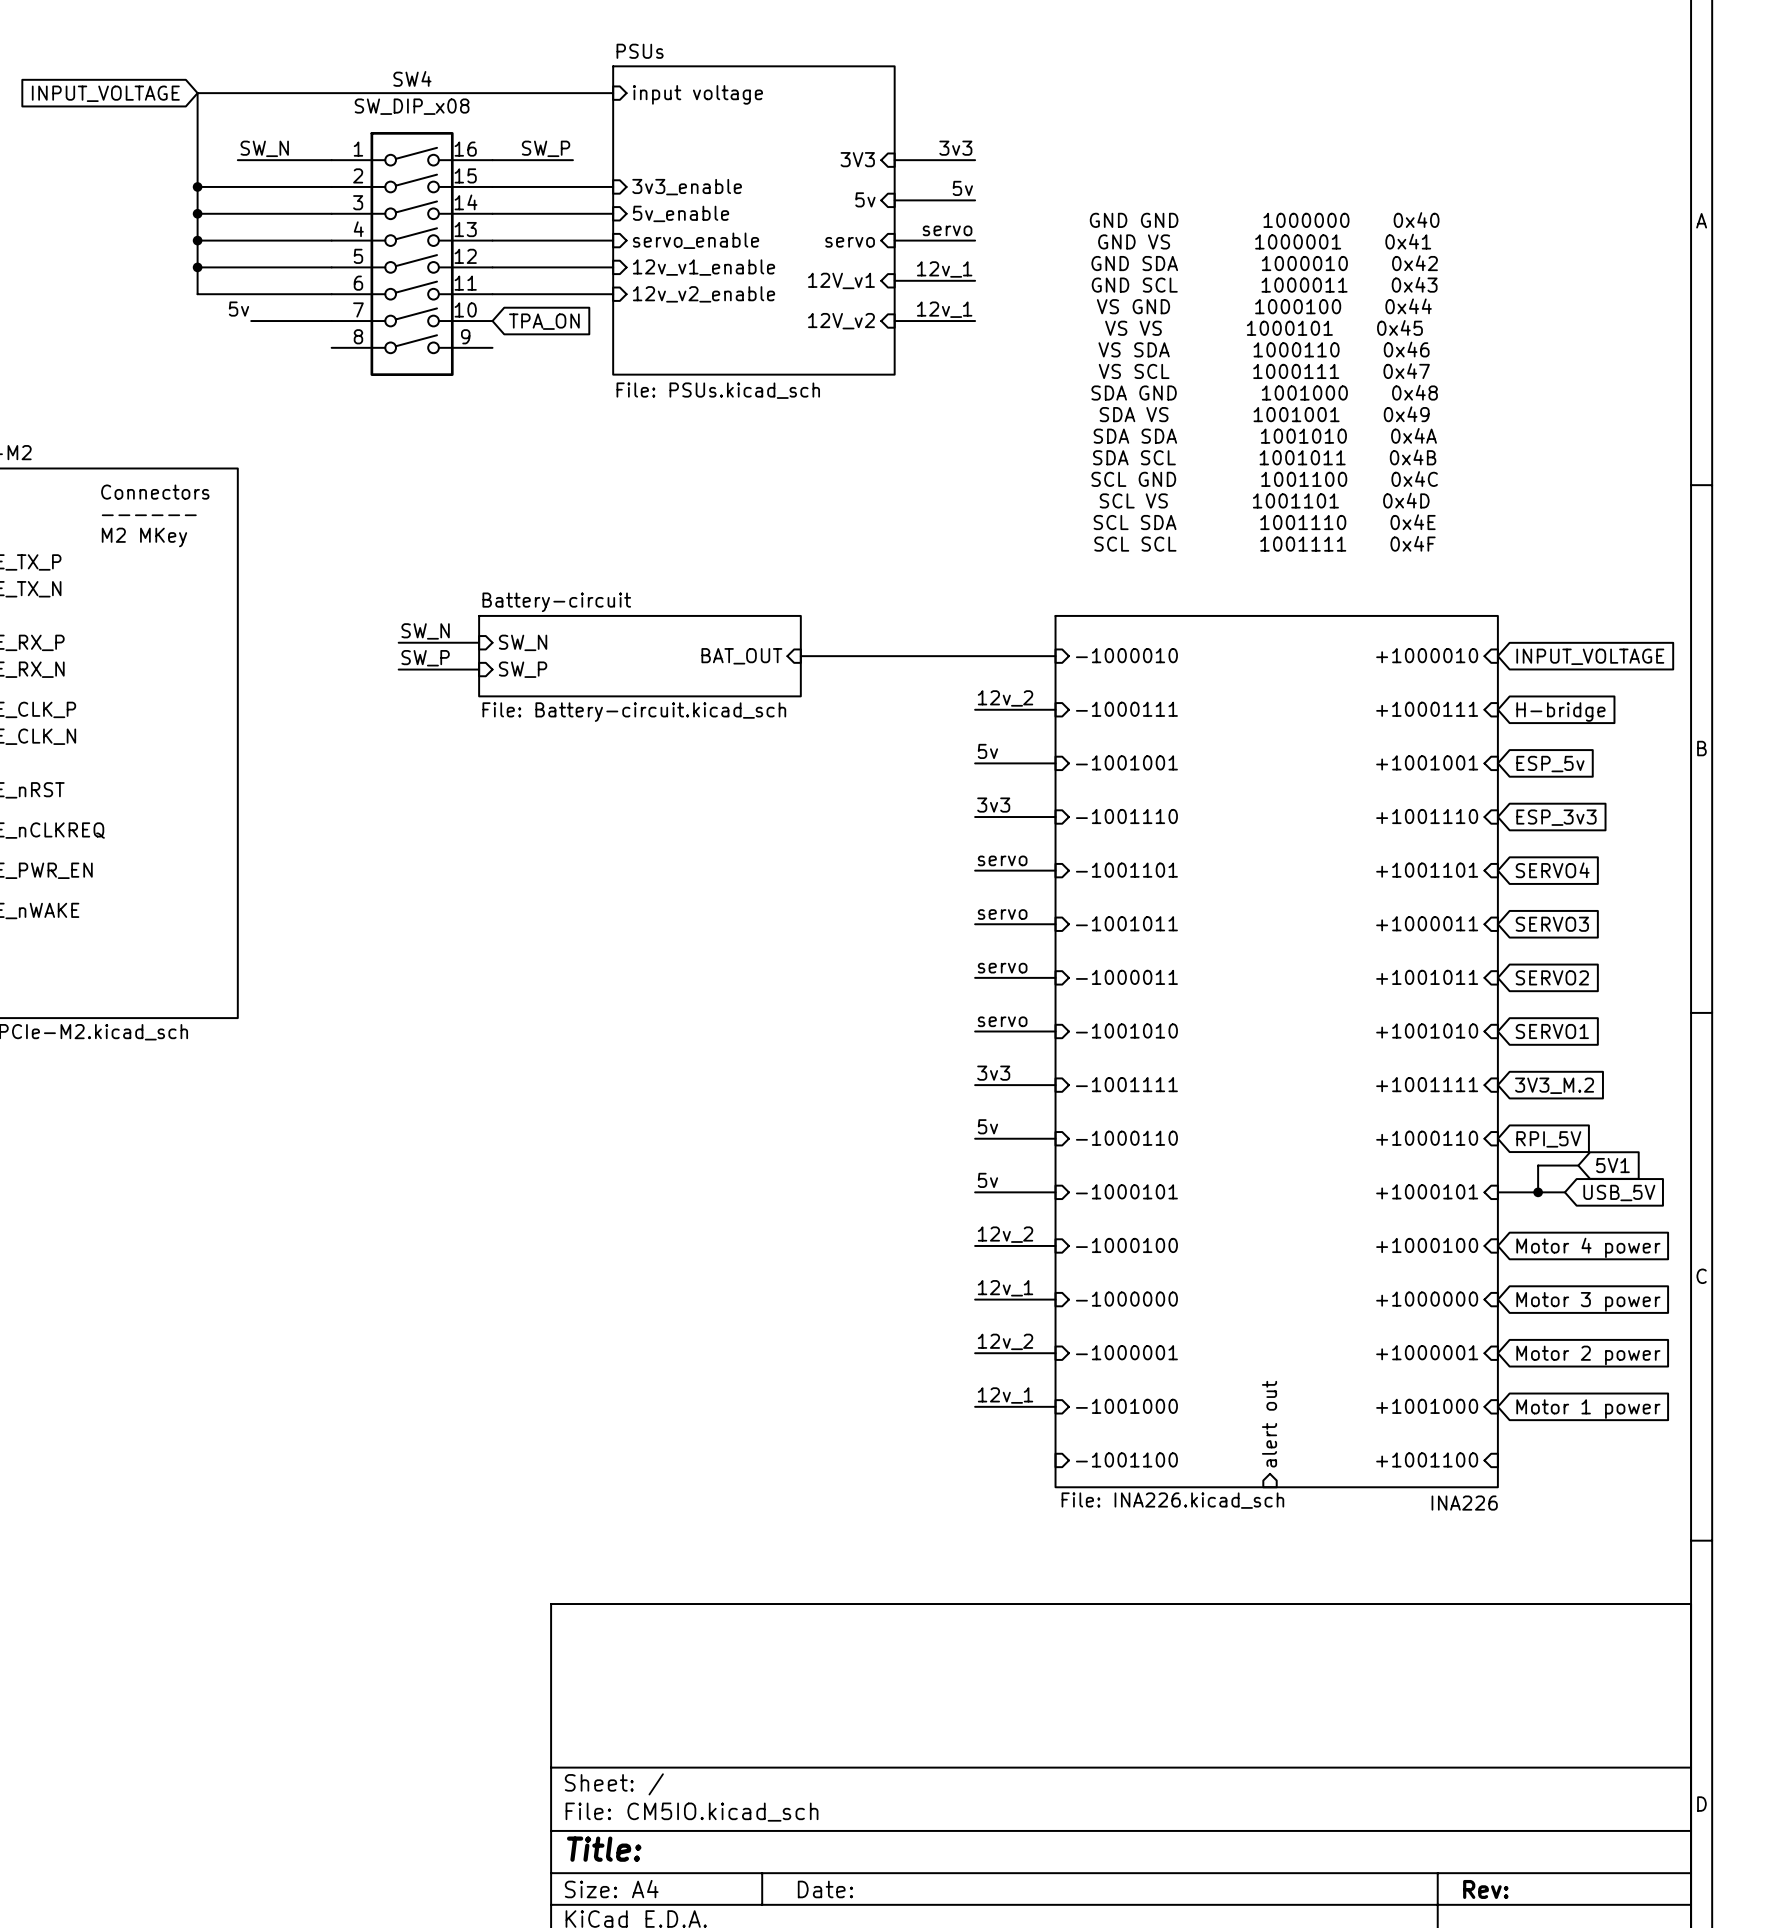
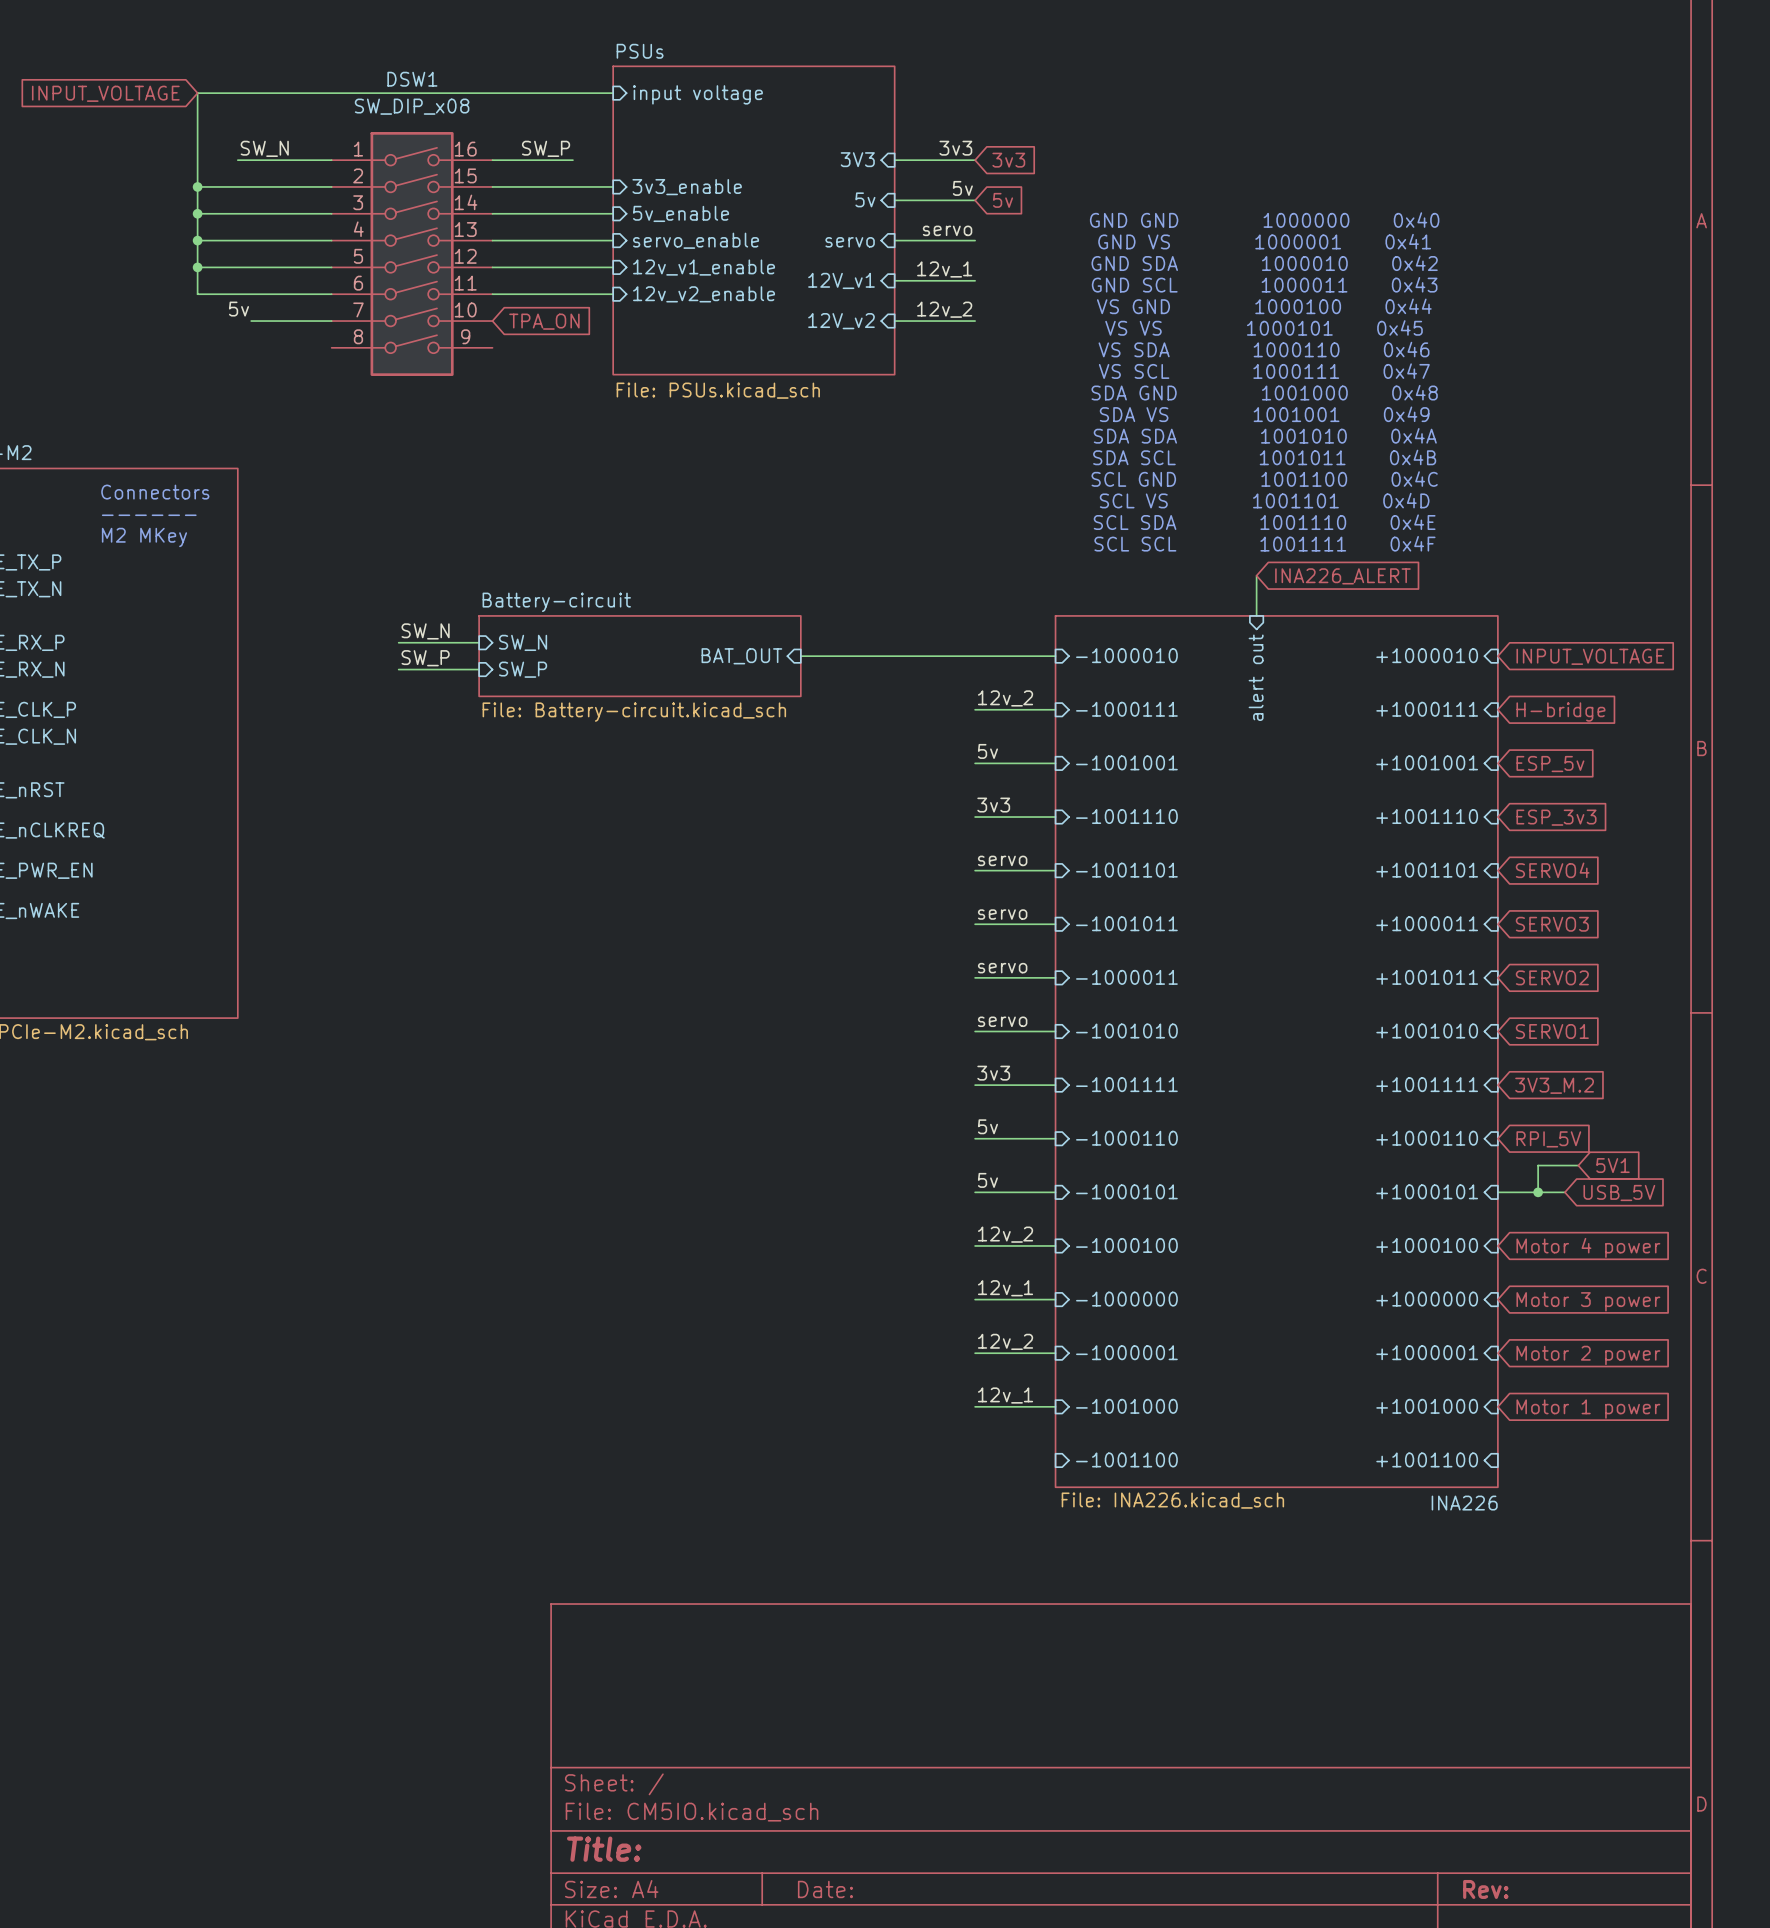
SW4 name: SW4 (412, 78) -> DSW1 (412, 79)
global label: none -> 3v3 (1008, 160)
global label: none -> 5v (1003, 200)
label: 12v_1 (944, 309) -> 12v_2 (944, 309)
wire: none -> (1256, 575) (1256, 615)
global label: none -> INA226_ALERT (1342, 576)
sheet pin: none -> alert out (1256, 677)
sheet pin: alert out (1269, 1424) -> none

